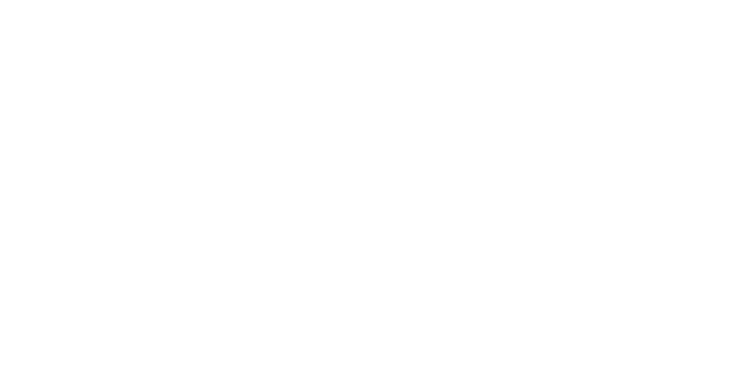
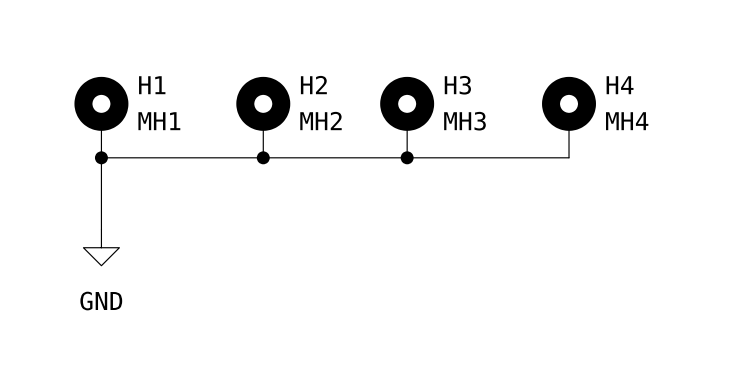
H1: none -> MH1 (101, 117)
H2: none -> MH2 (263, 117)
H3: none -> MH3 (407, 117)
H4: none -> MH4 (569, 117)
junction: none -> (101, 157)
junction: none -> (263, 157)
junction: none -> (407, 157)
wire: none -> (569, 157) (101, 157) (101, 229)
power symbol: none -> GND (101, 247)

